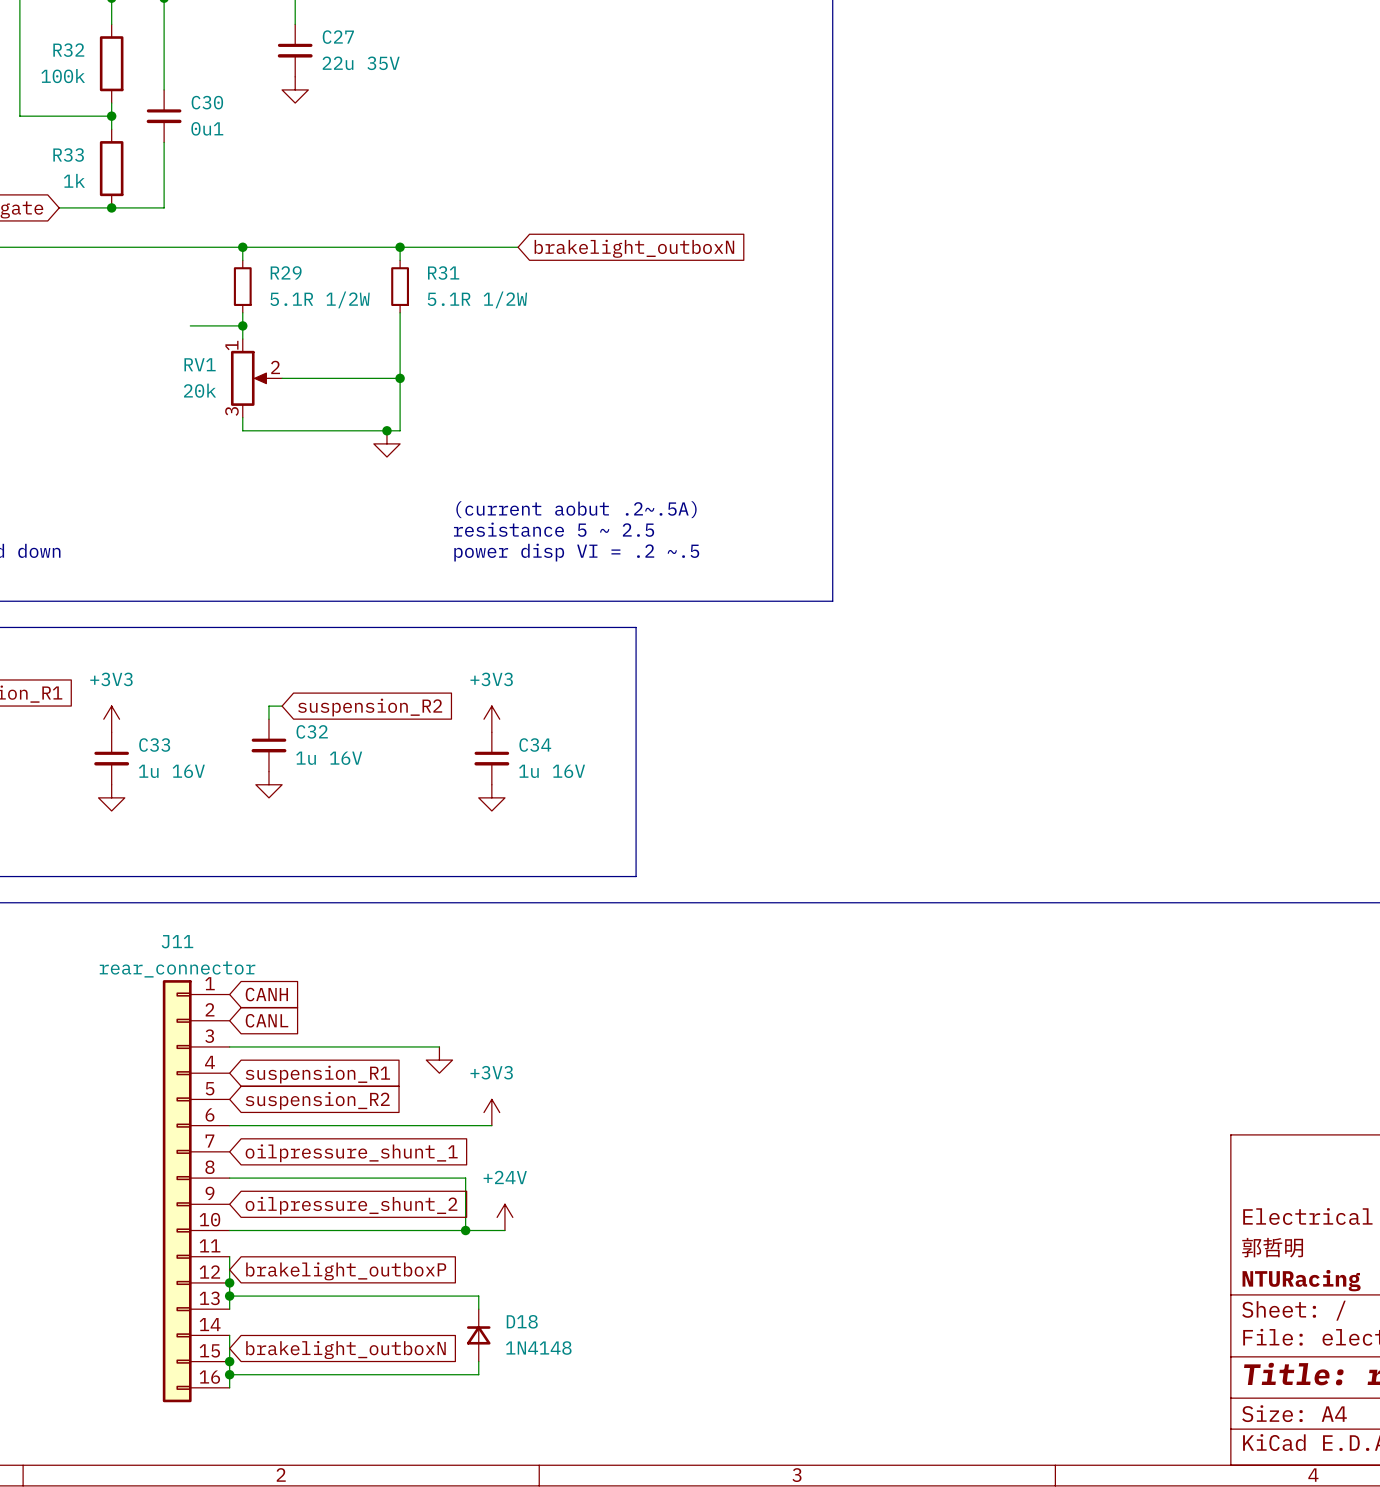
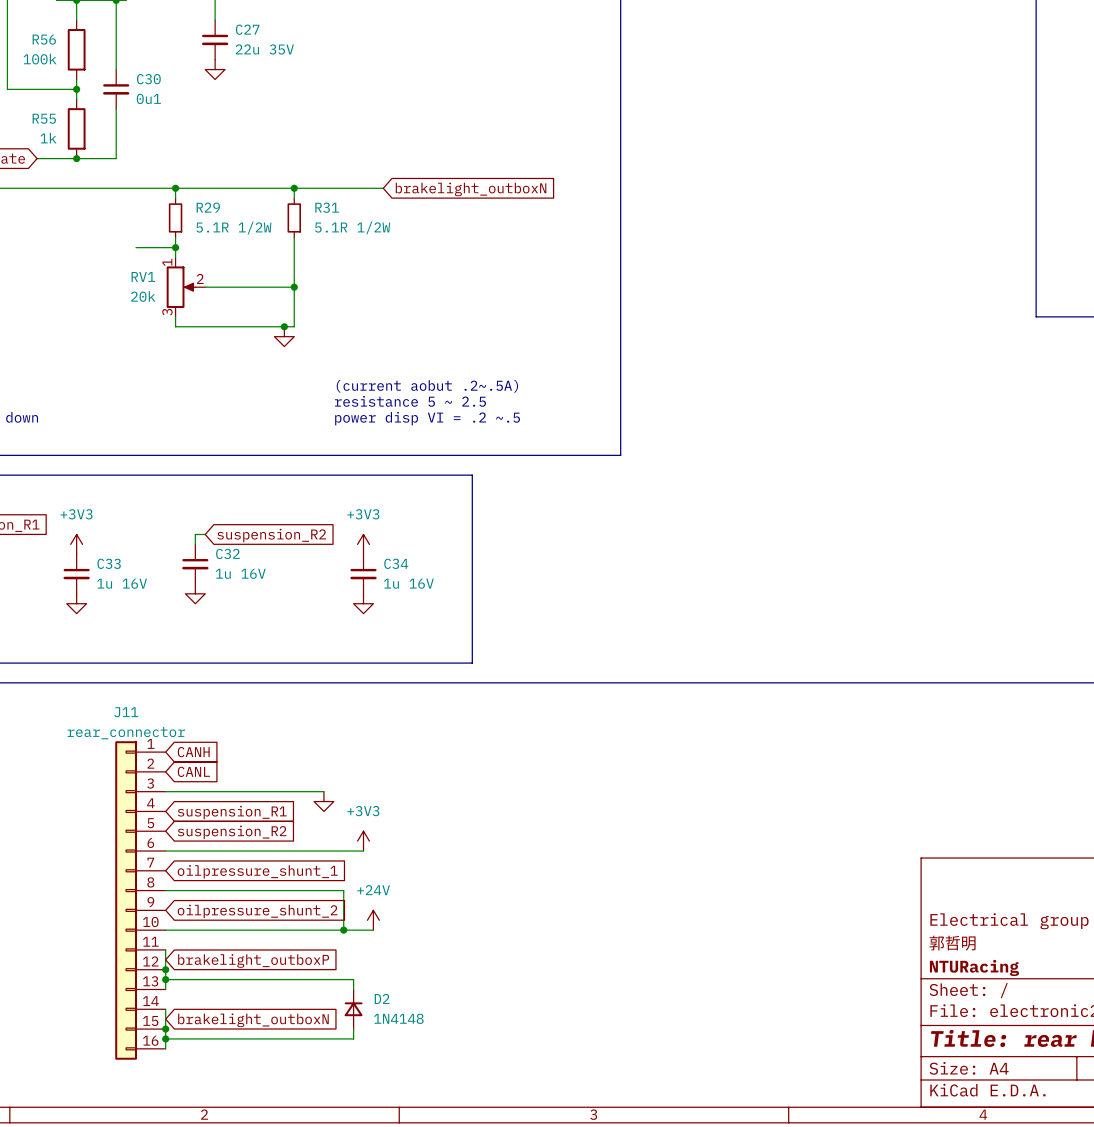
R32 name: R32 (68, 50) -> R56 (44, 39)
R33 name: R33 (68, 155) -> R55 (44, 118)
D18 name: D18 (522, 1321) -> D2 (382, 998)

